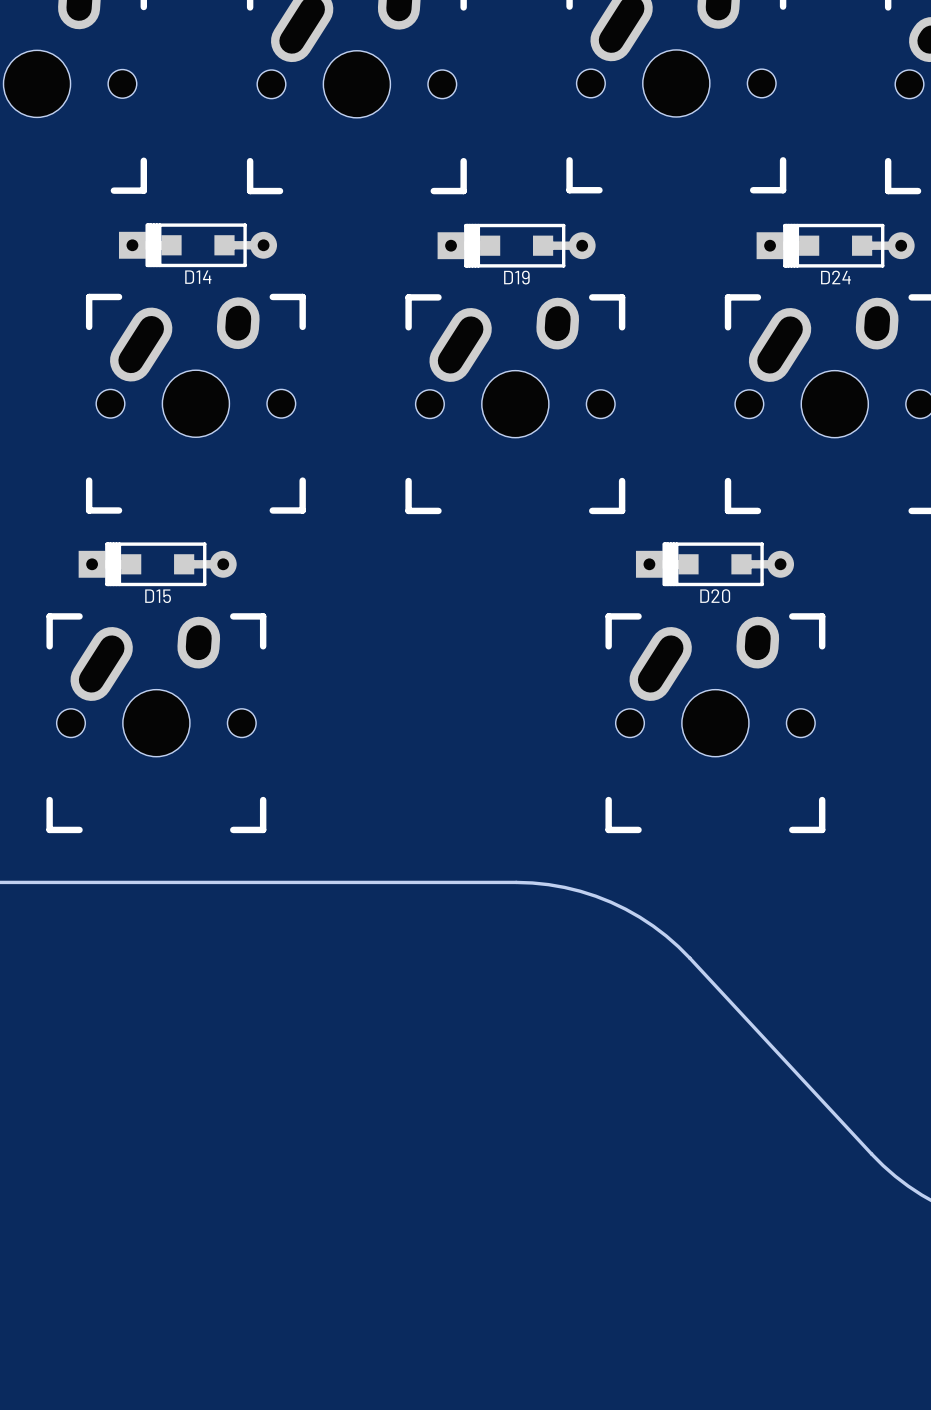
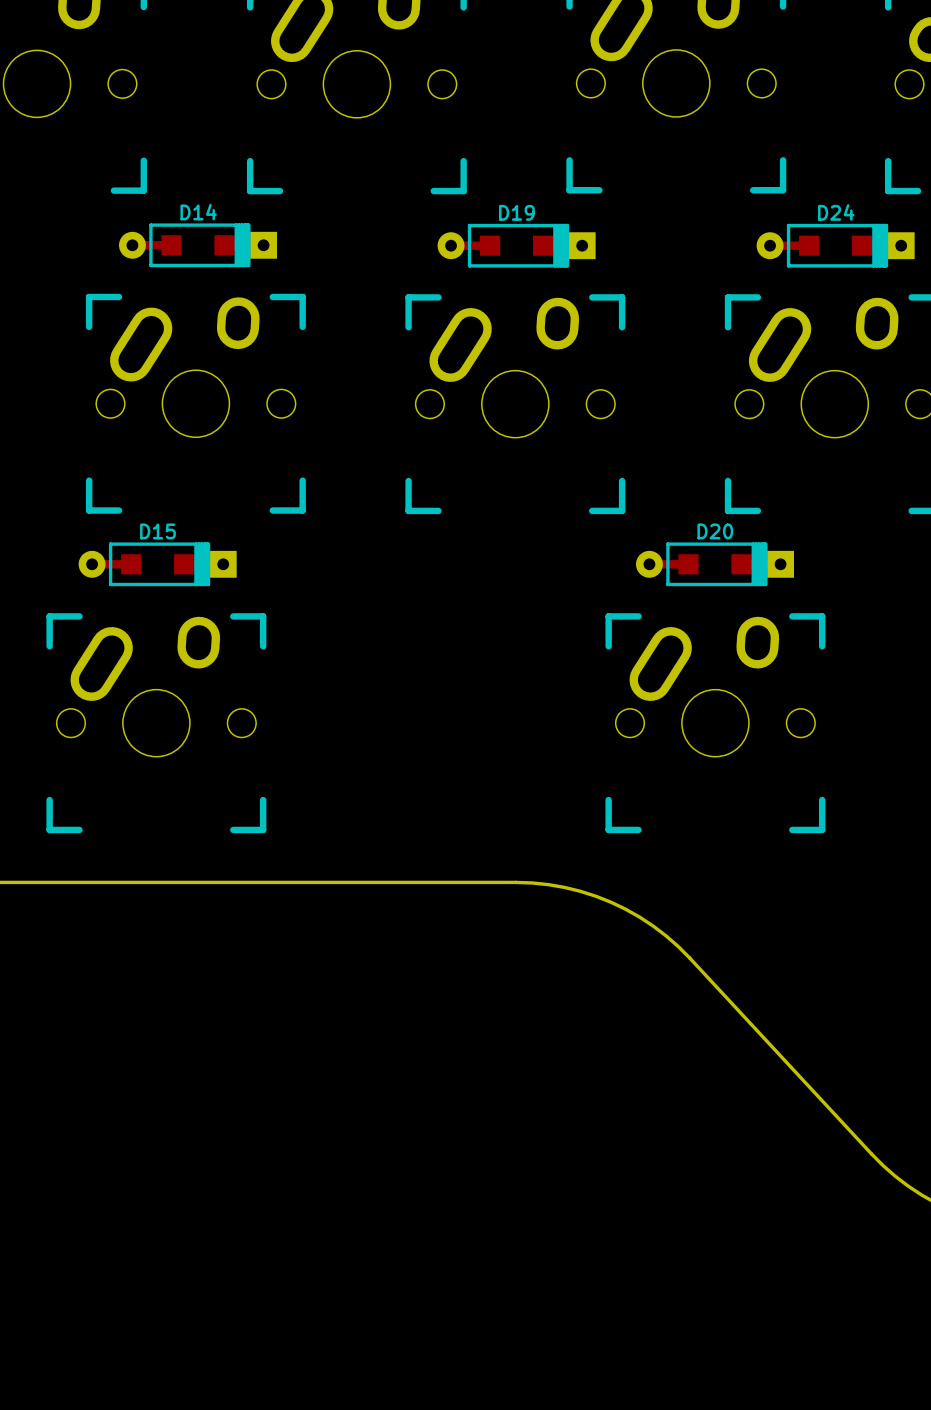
D14 rotation: 0° (198, 245) -> 180° (198, 245)
D19 rotation: 0° (516, 245) -> 180° (516, 245)
D24 rotation: 0° (835, 245) -> 180° (835, 245)
D15 rotation: 0° (157, 564) -> 180° (157, 564)
D20 rotation: 0° (714, 564) -> 180° (714, 564)

